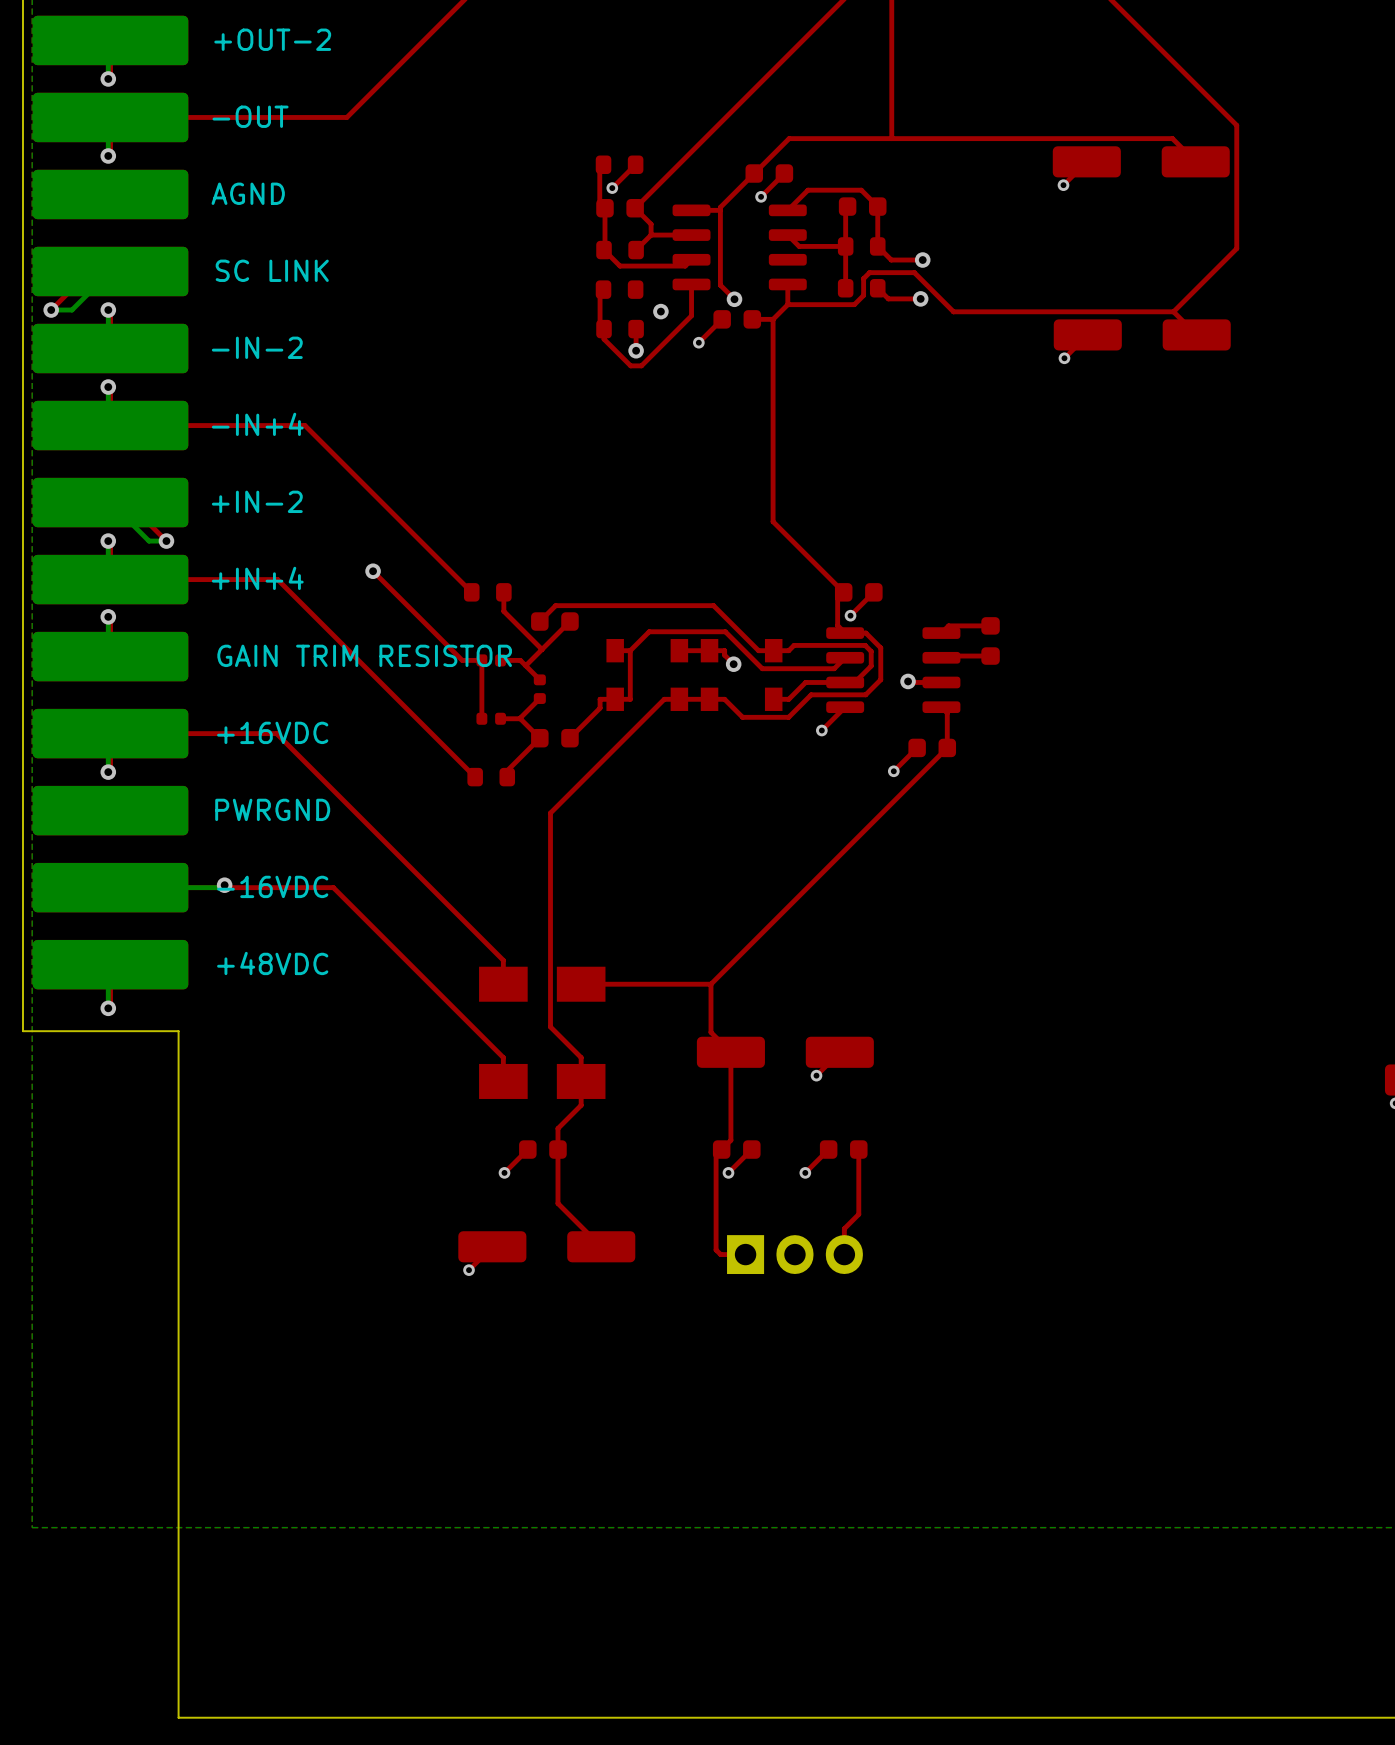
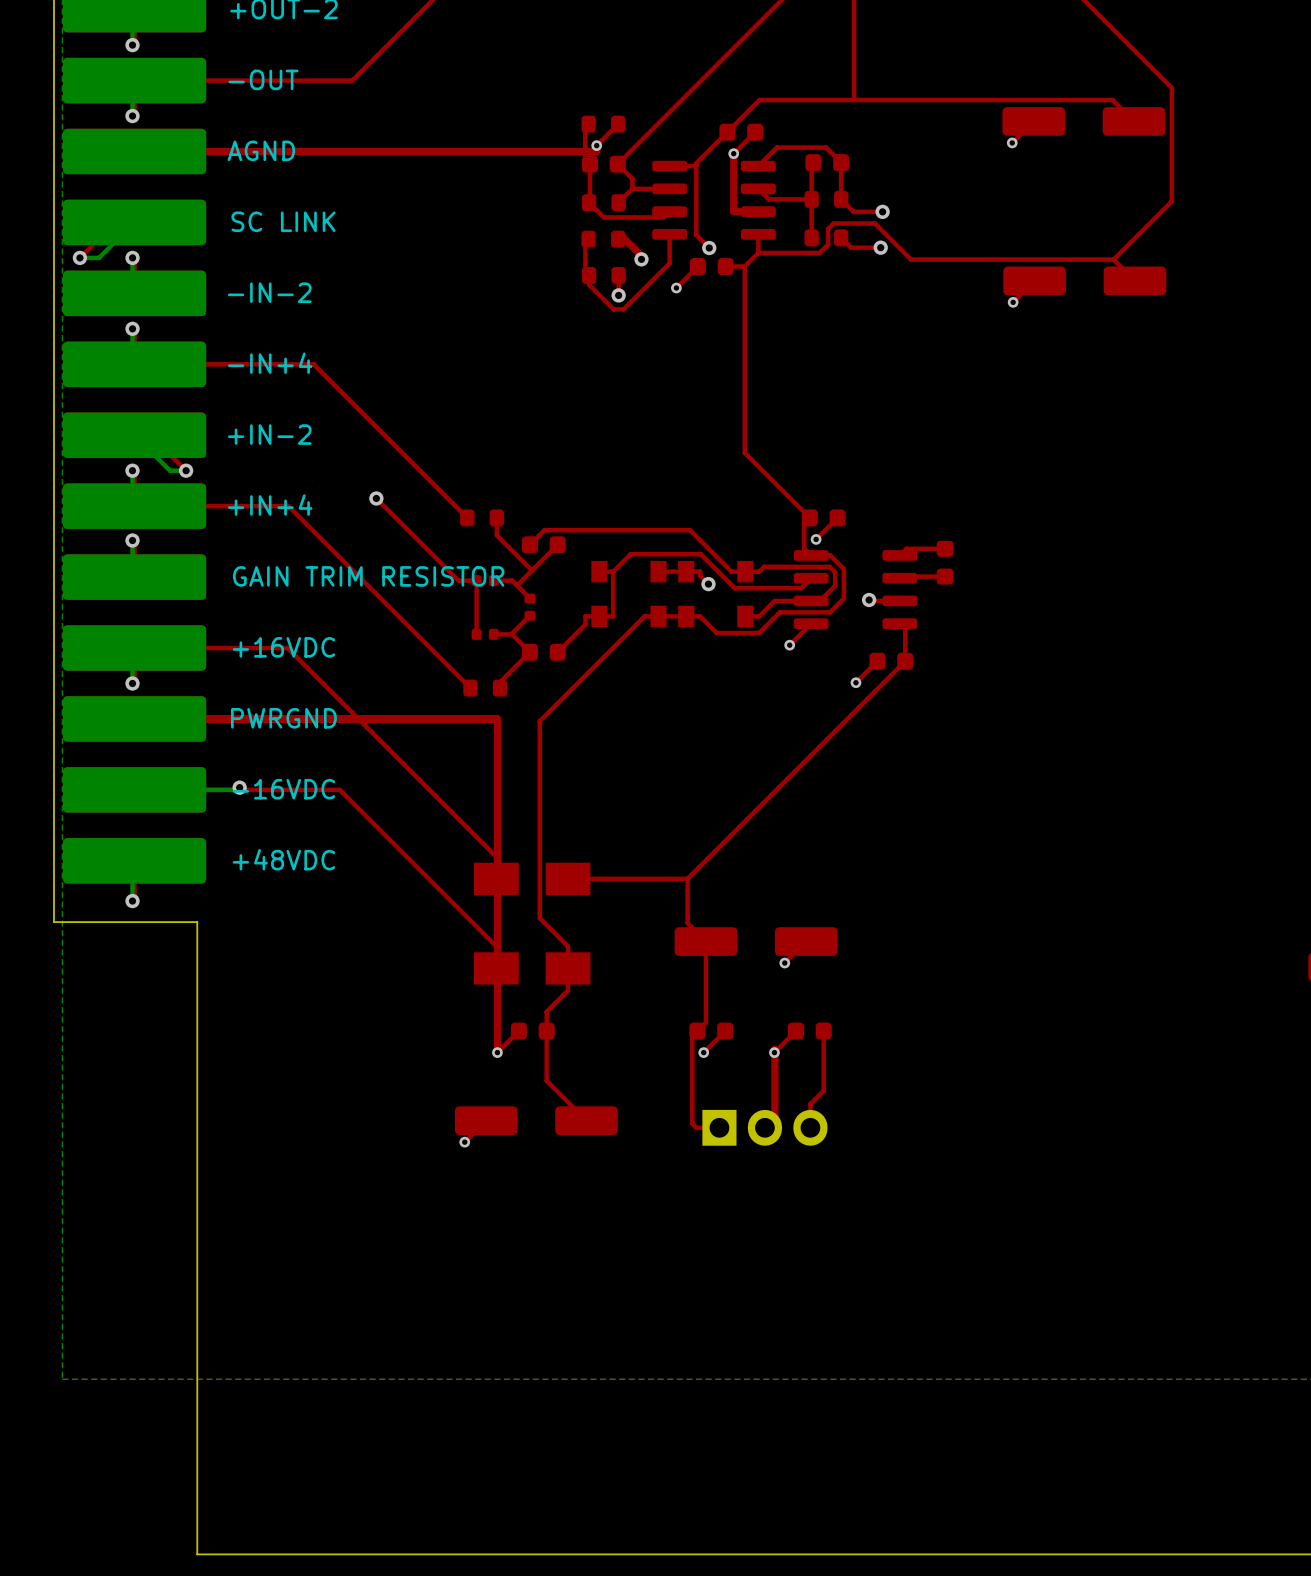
top track: none -> (596, 145) (596, 151) (134, 151)
top track: none -> (733, 153) (733, 211) (758, 211)
top track: none -> (620, 234) (642, 257)
top track: none -> (134, 718) (497, 718) (497, 1052)
top track: none -> (774, 1049) (774, 1117) (765, 1126)

